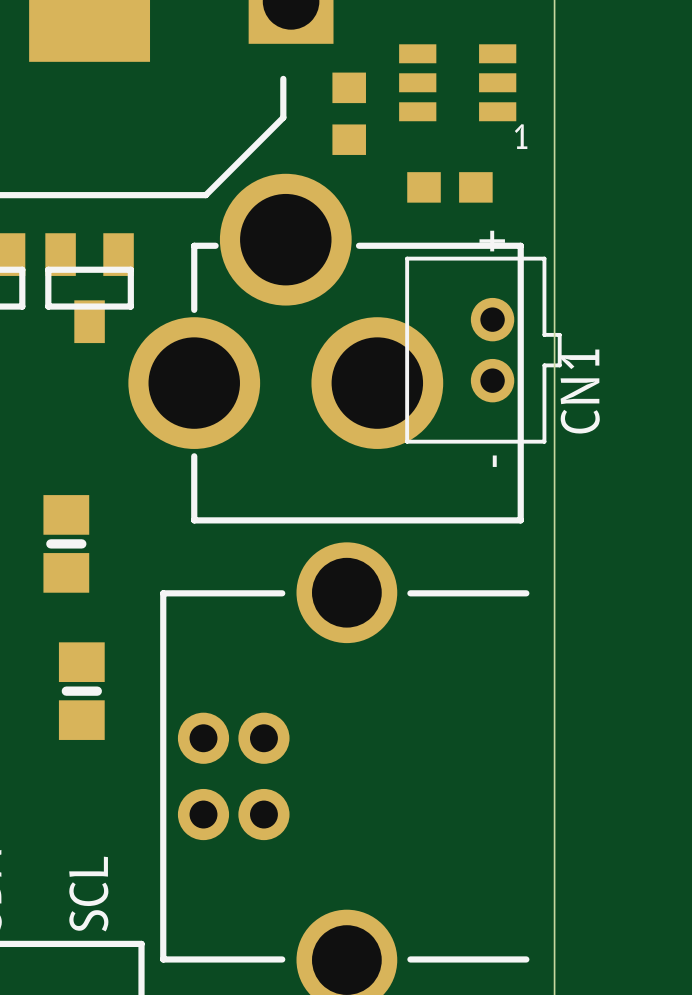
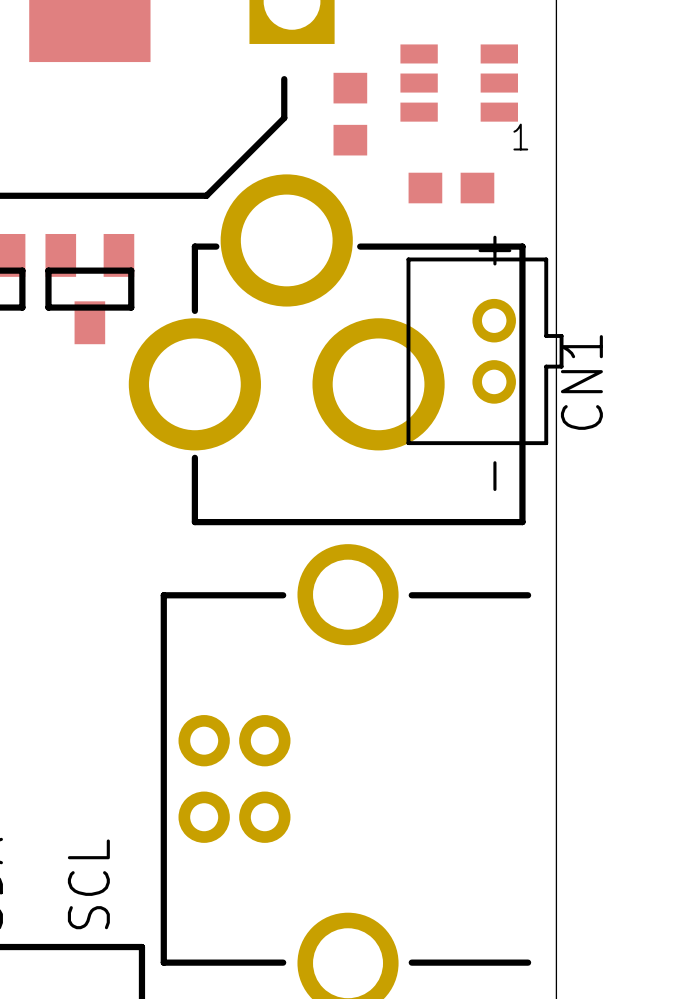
part: (66, 543) -> none
part: (81, 691) -> none

